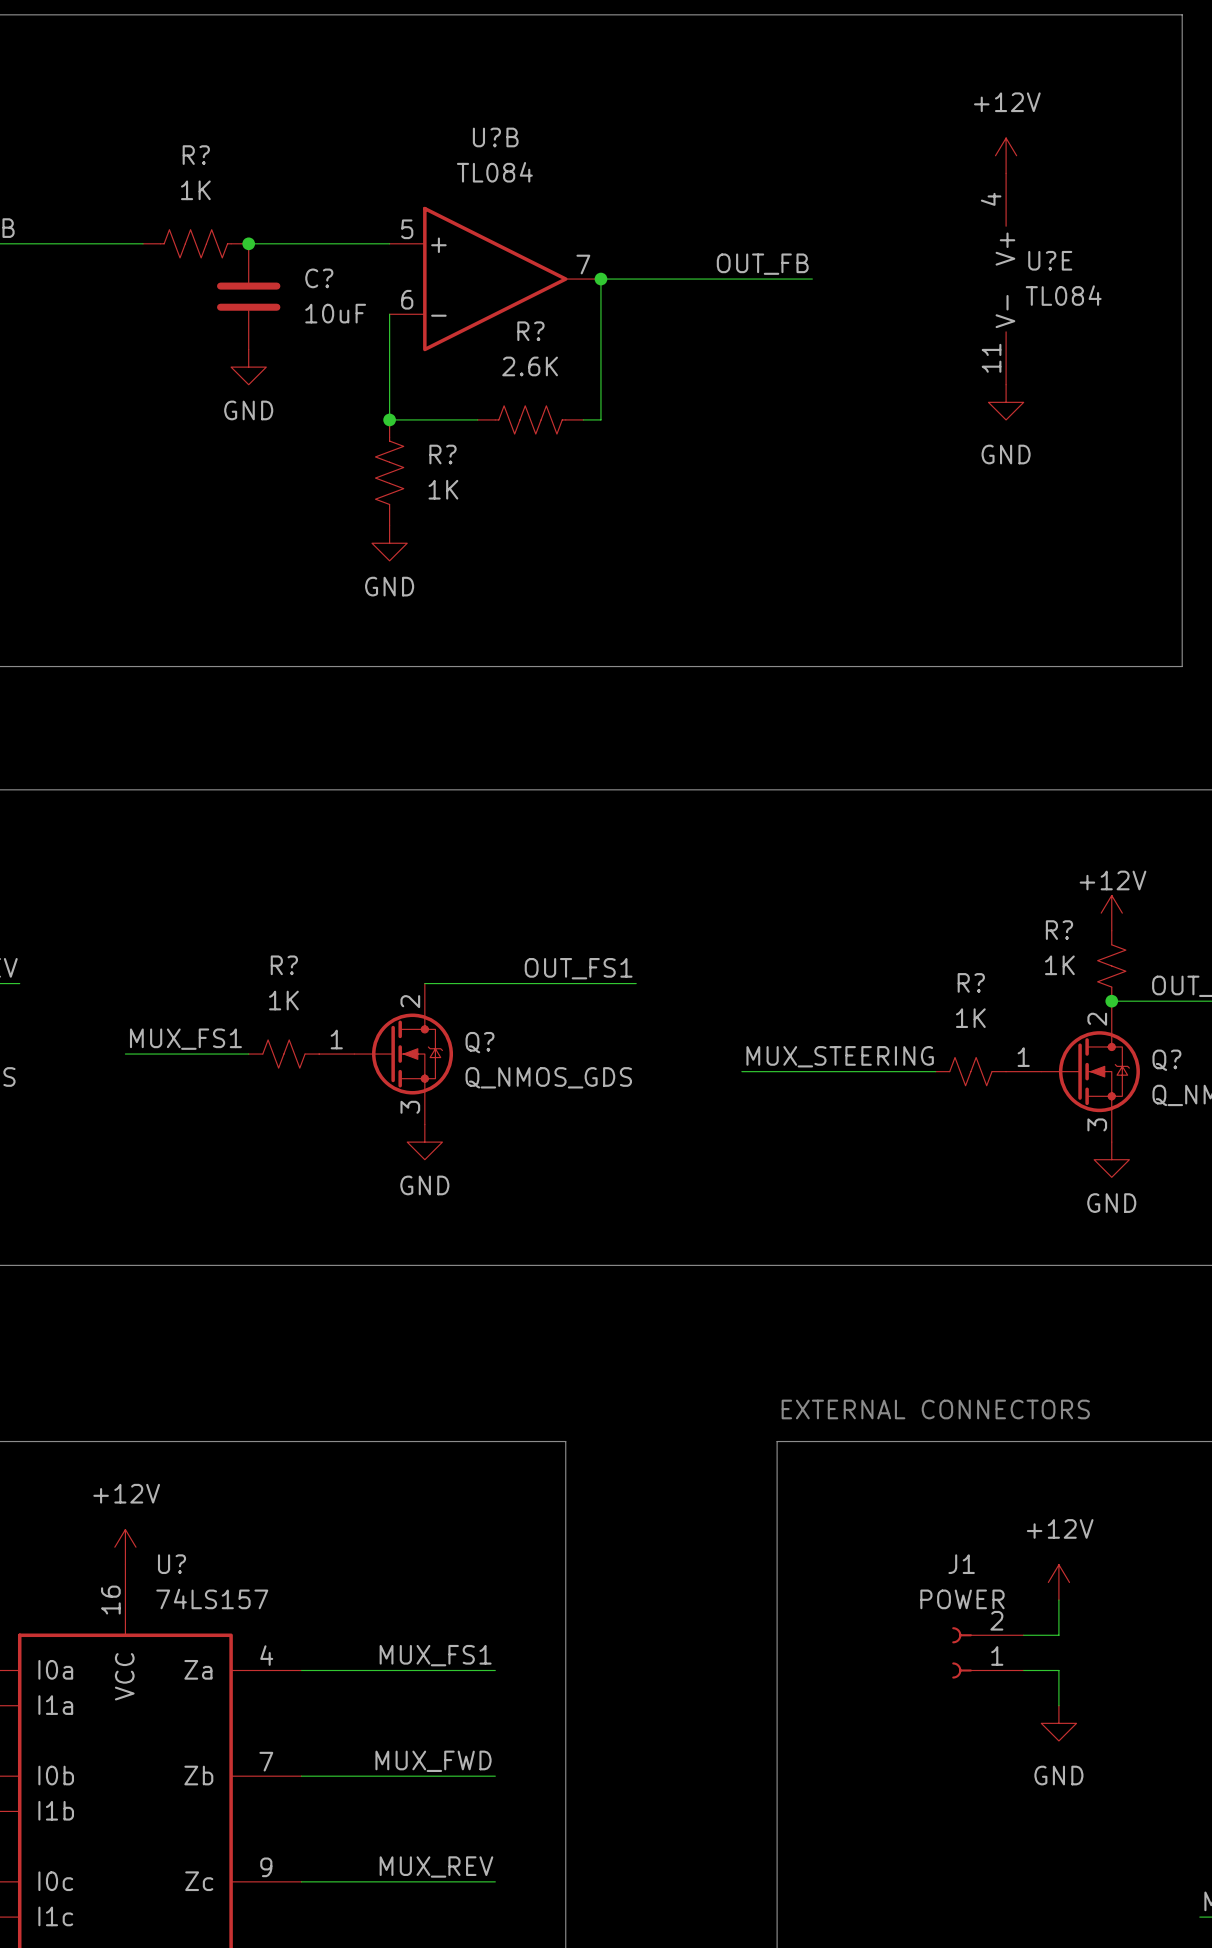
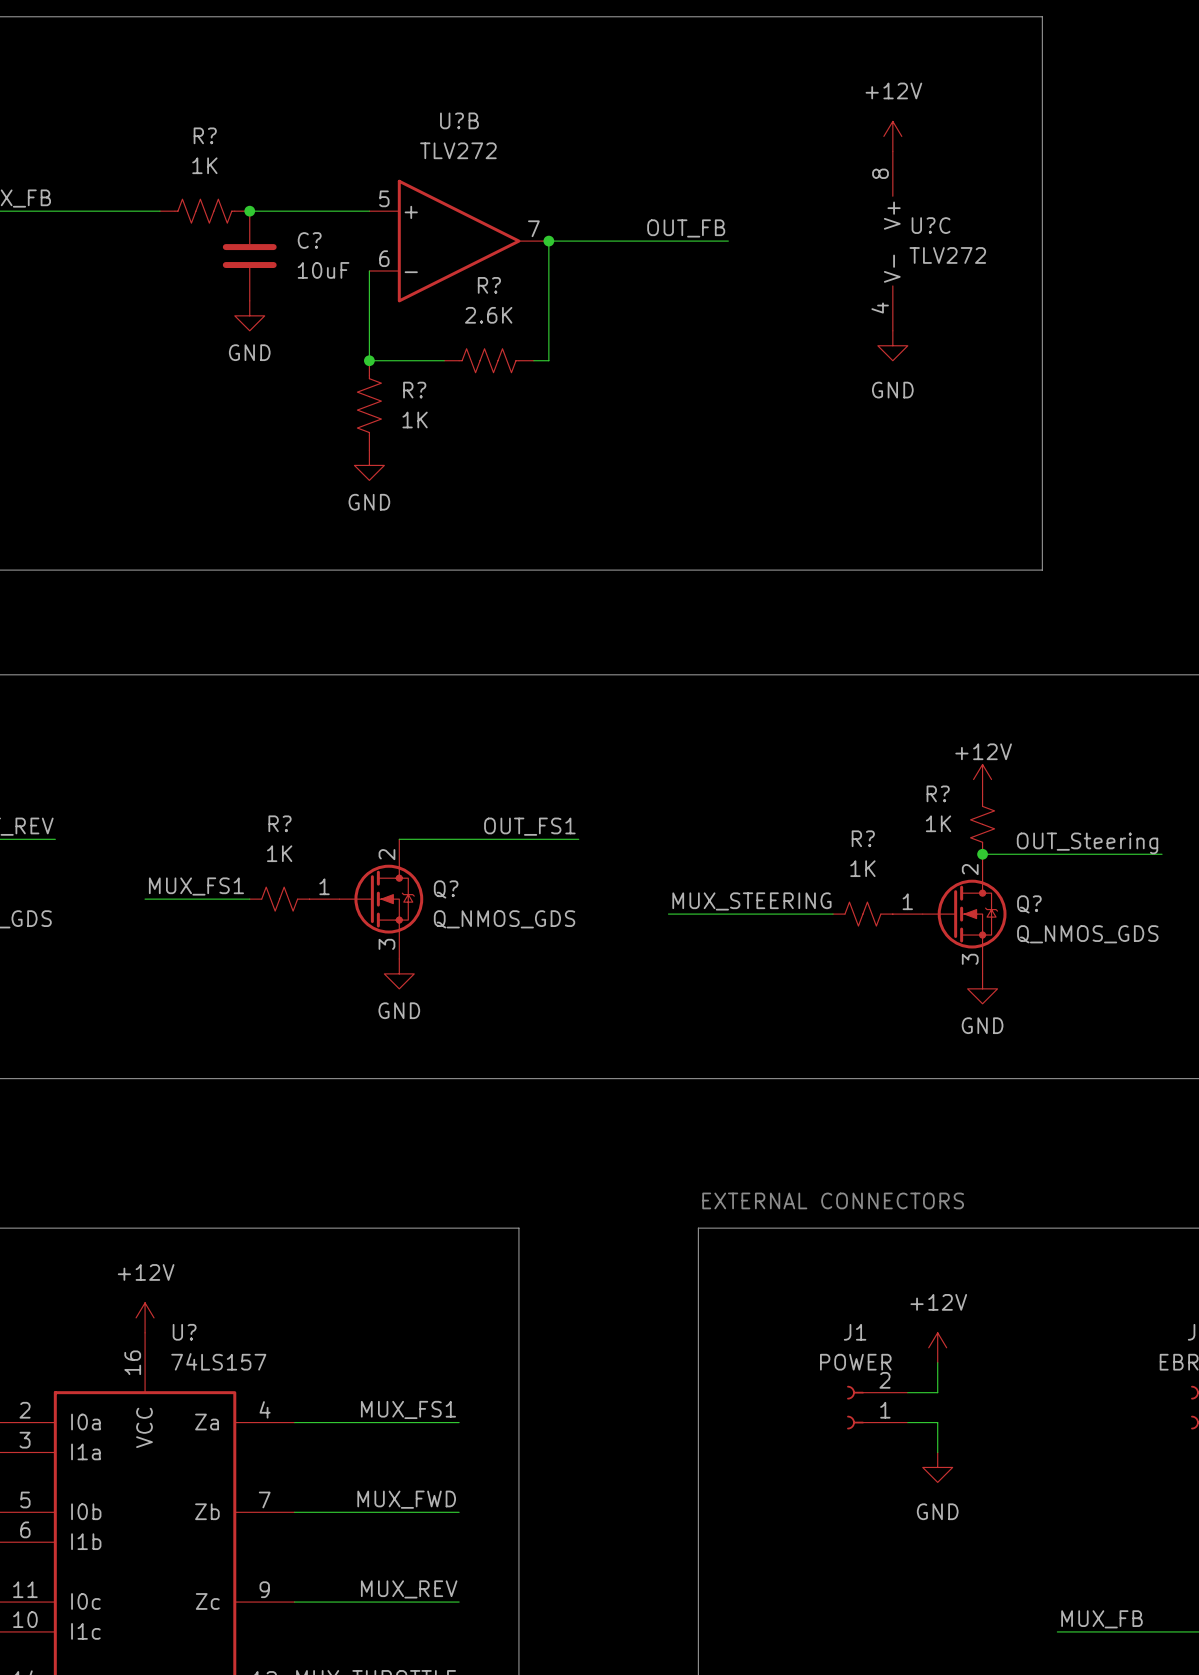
U?B value: TL084 (494, 172) -> TLV272 (458, 150)
U?E pin number: 4 (991, 199) -> 8 (880, 173)
U?E name: U?E (1050, 260) -> U?C (931, 225)
U?E value: TL084 (1063, 295) -> TLV272 (947, 255)
U?E pin number: 11 (991, 358) -> 4 (880, 308)

